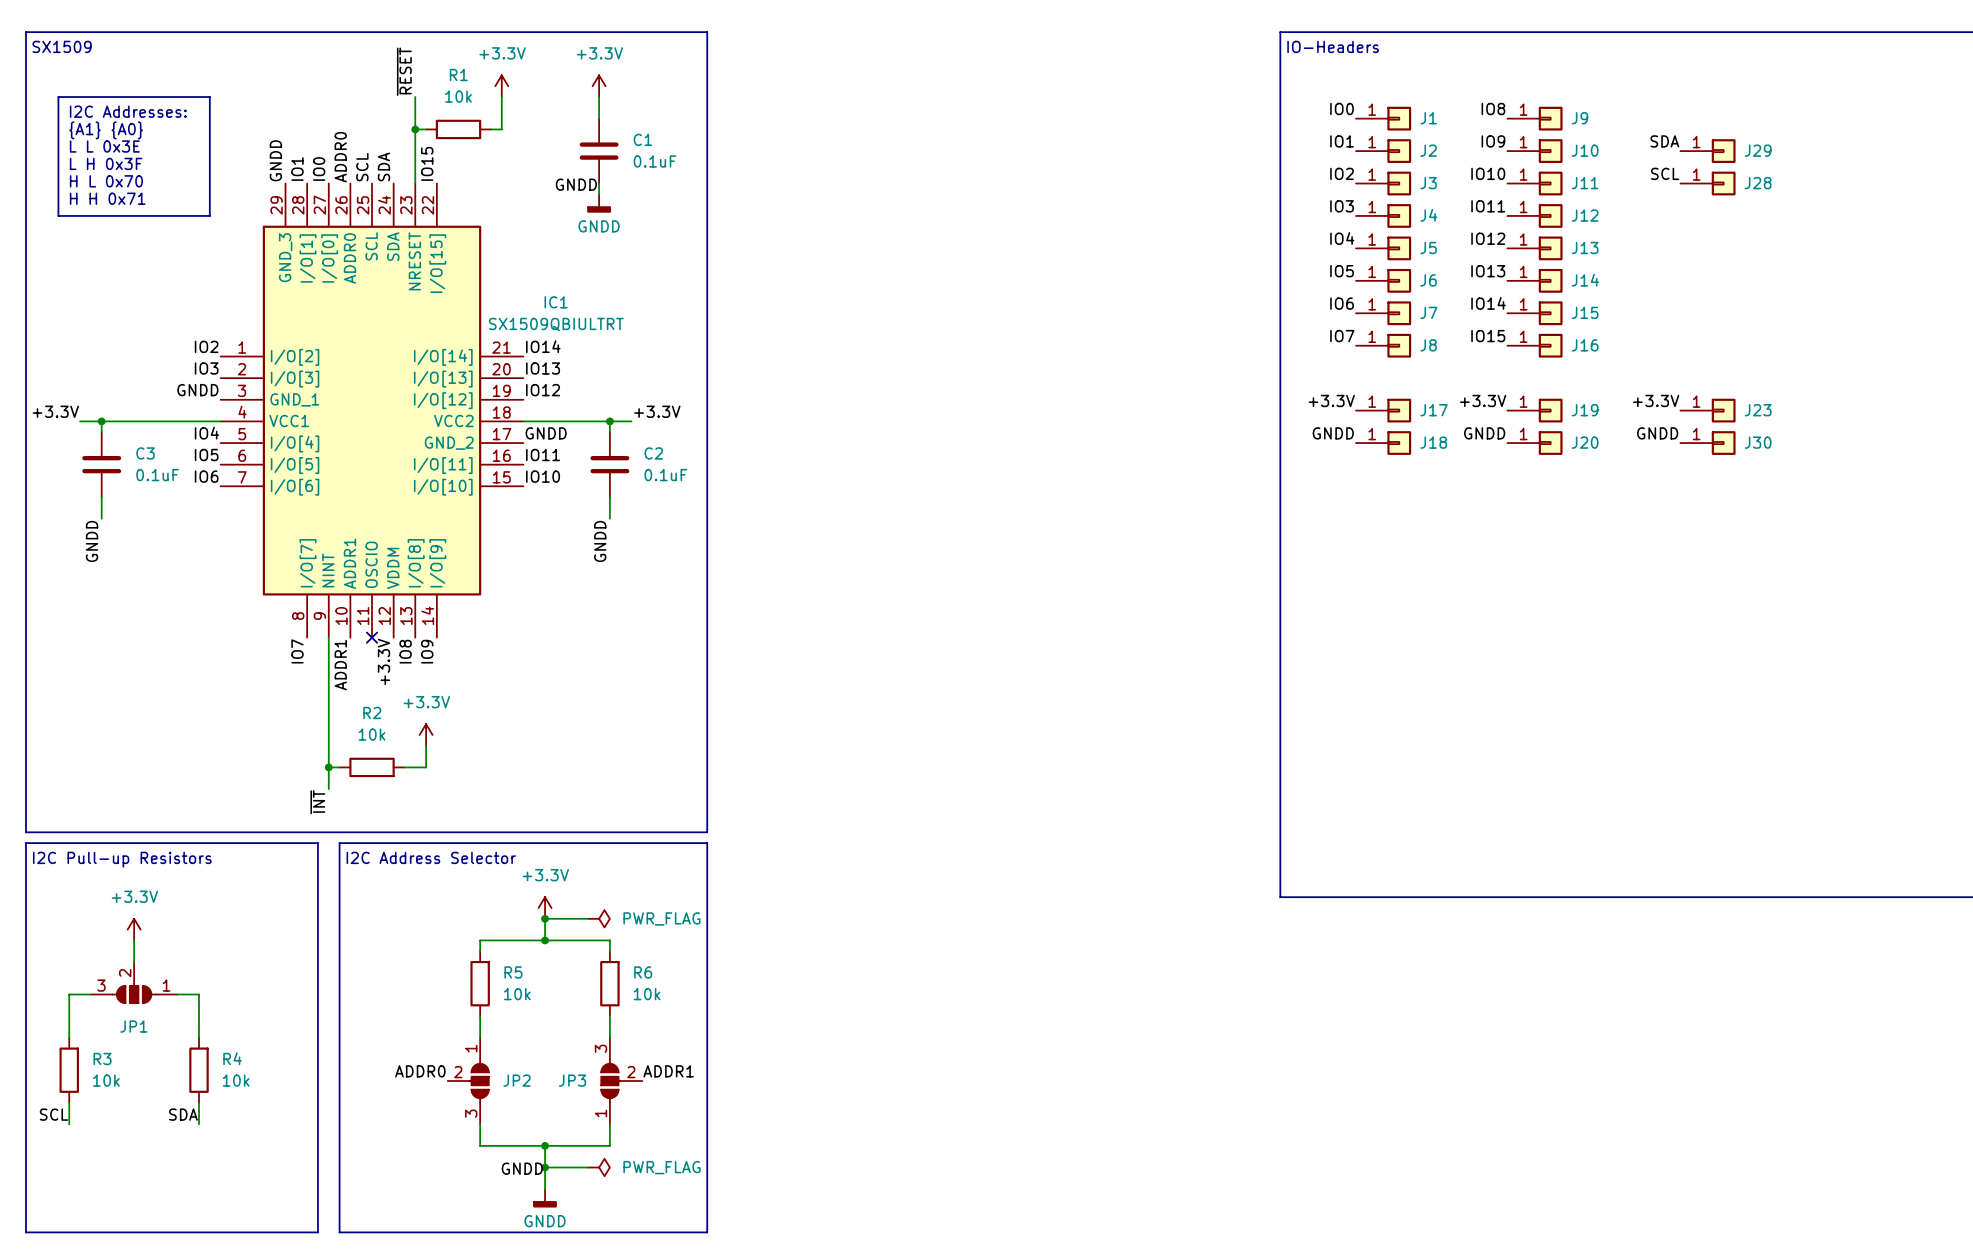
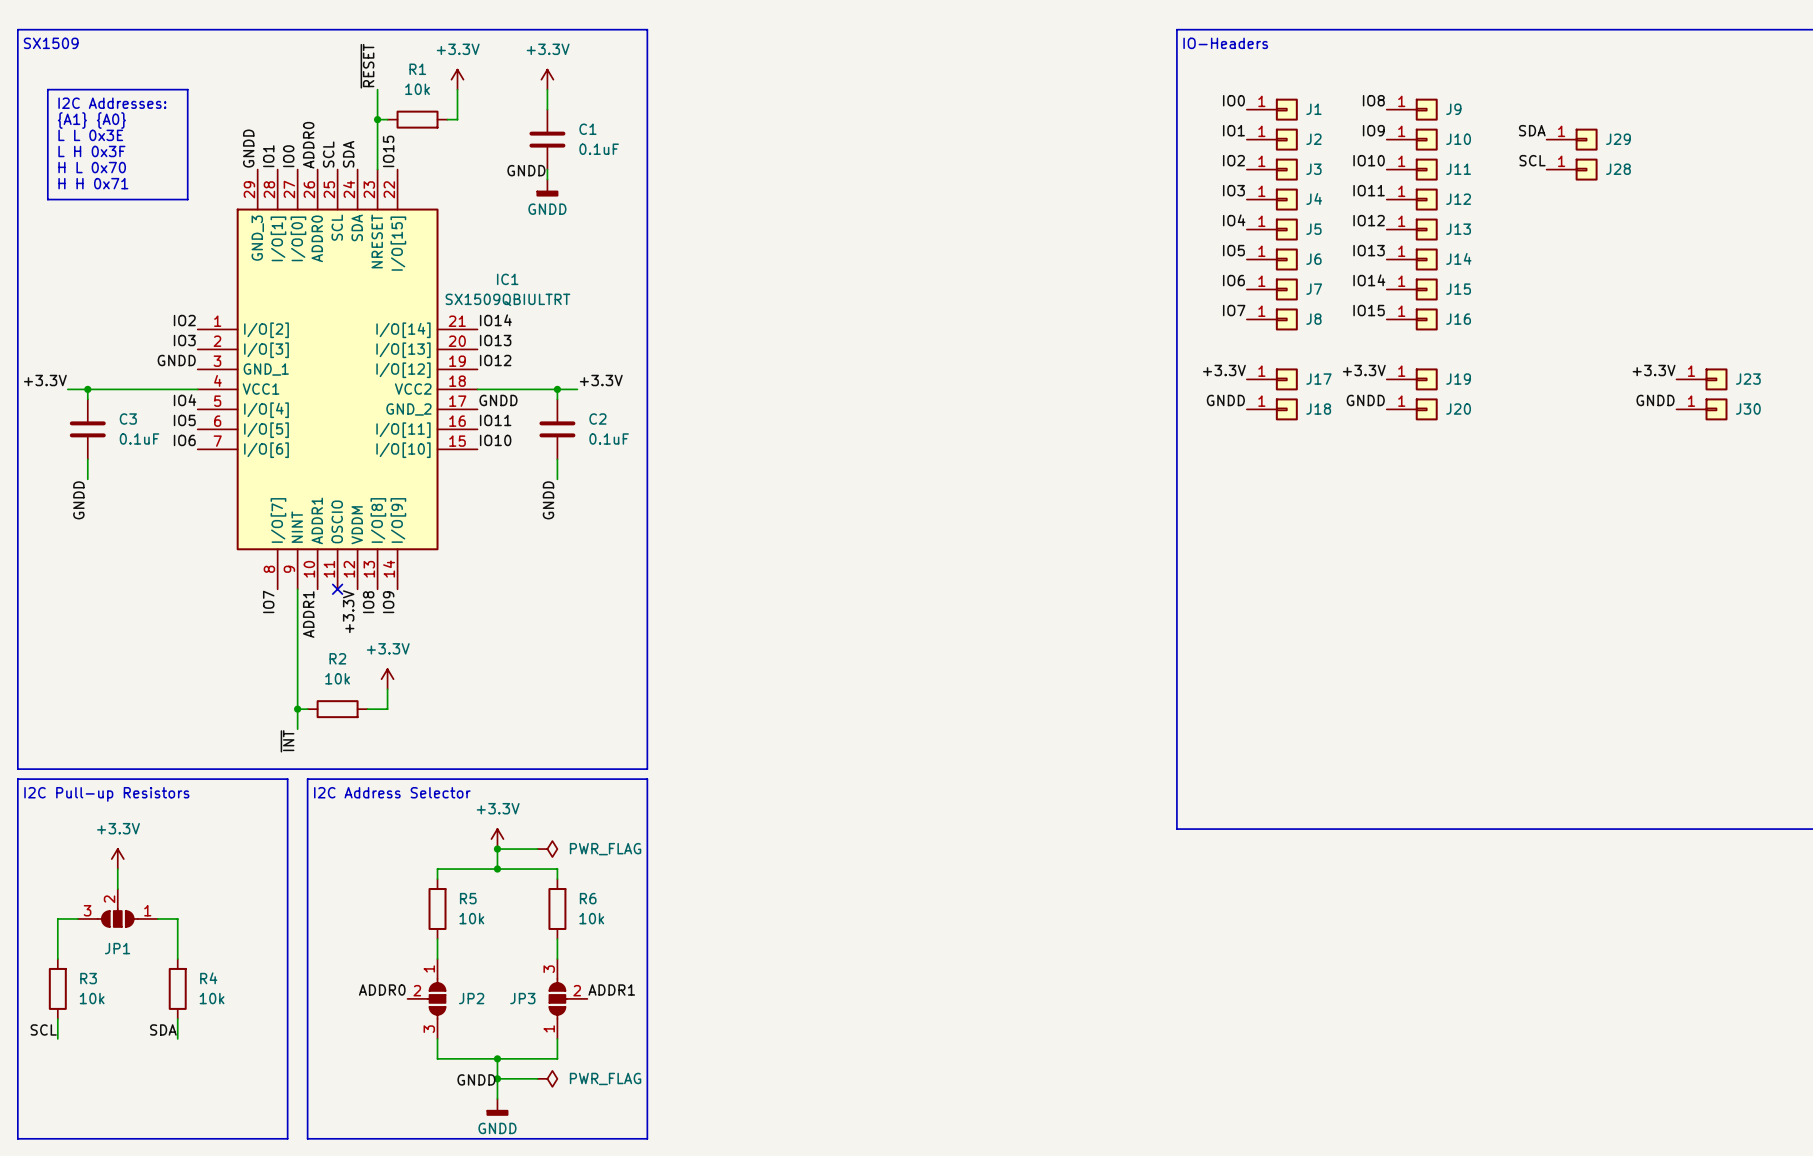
label position: +3.3V (1656, 400) -> +3.3V (1654, 370)
J23 position: (1707, 410) -> (1702, 379)
label position: GNDD (1657, 433) -> GNDD (1655, 400)
J30 position: (1707, 443) -> (1702, 409)

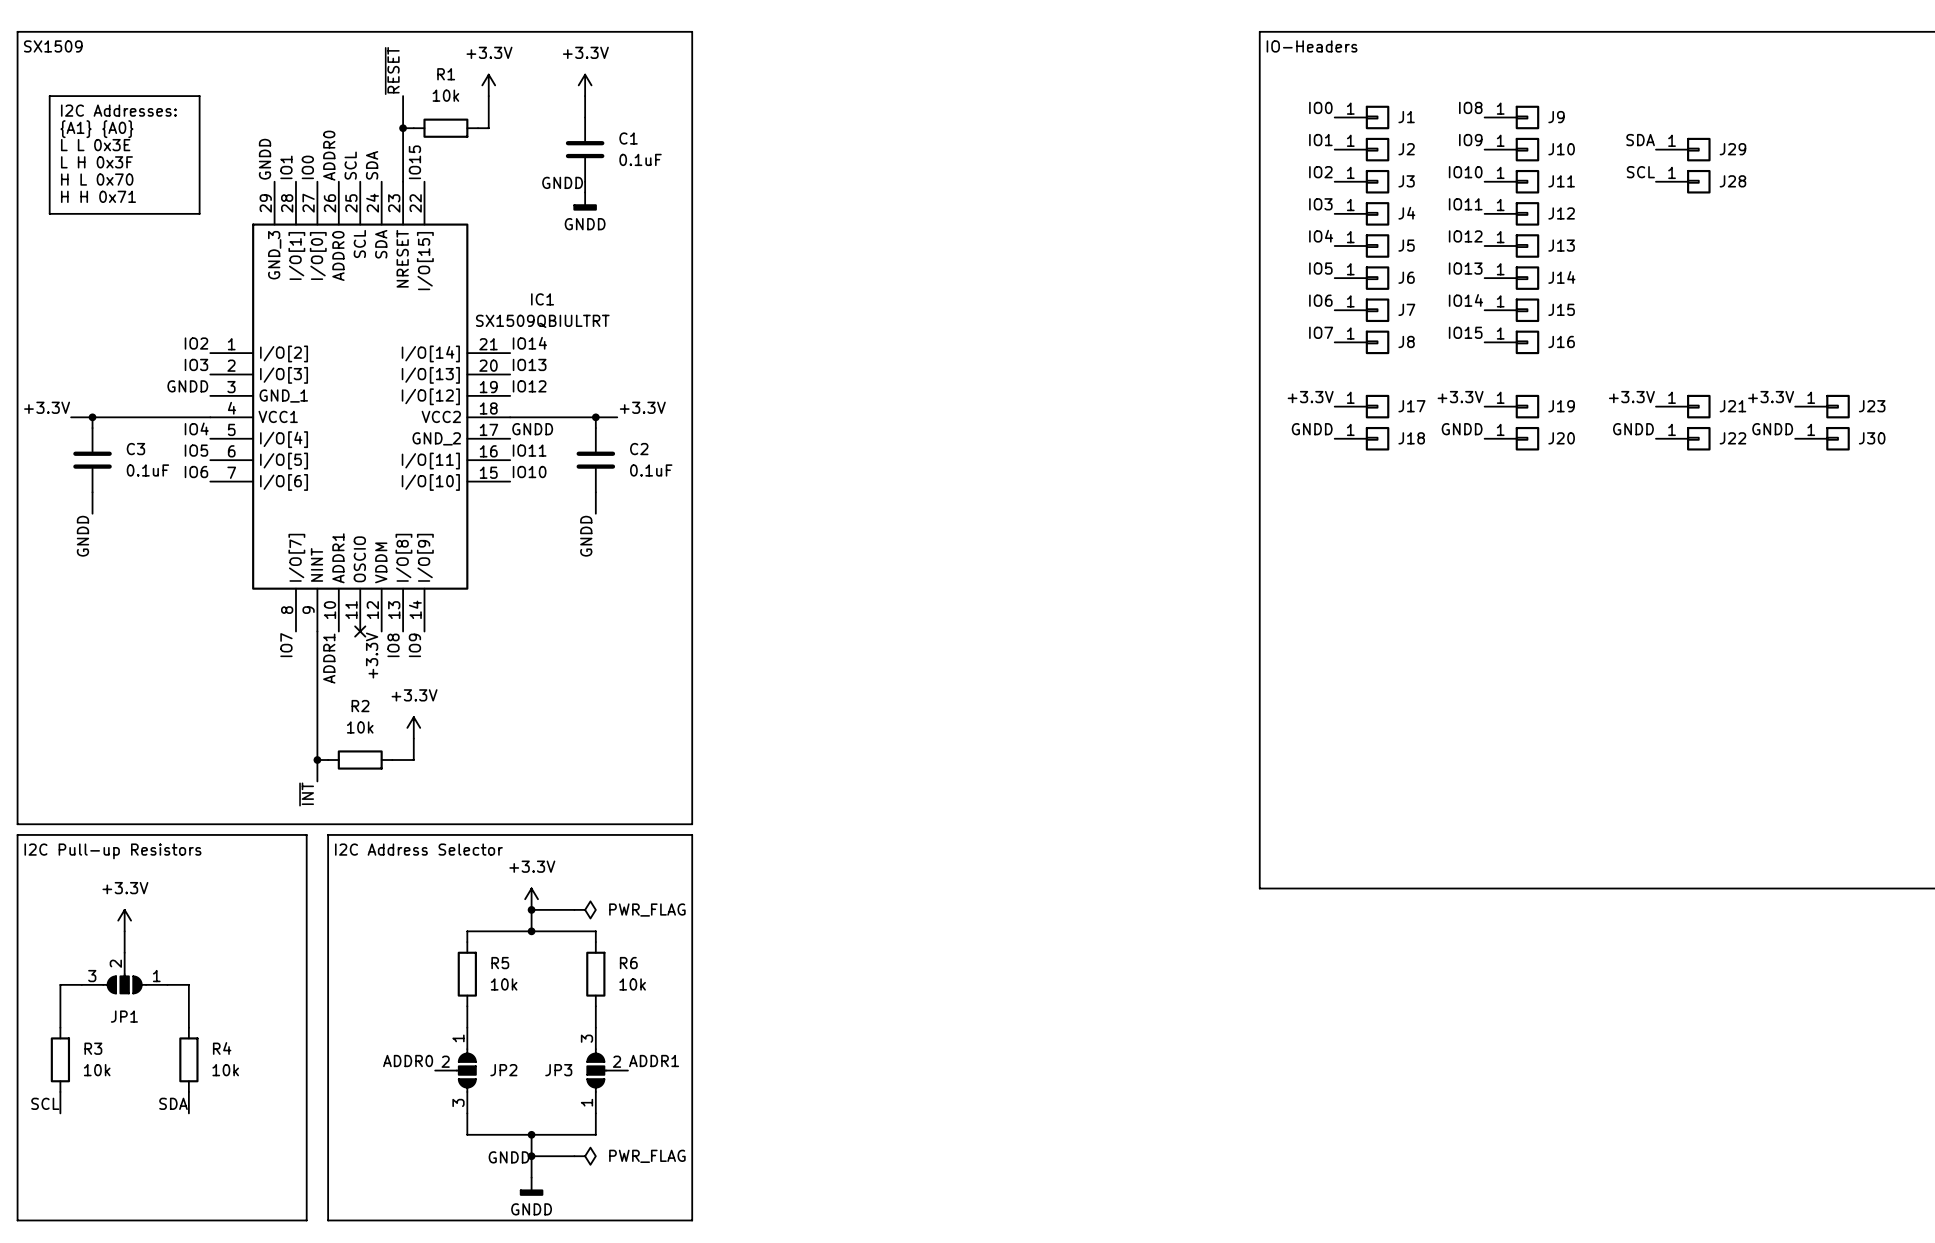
label: none -> +3.3V (1631, 397)
J21: none -> (1683, 406)
label: none -> GNDD (1633, 429)
J22: none -> (1683, 438)

